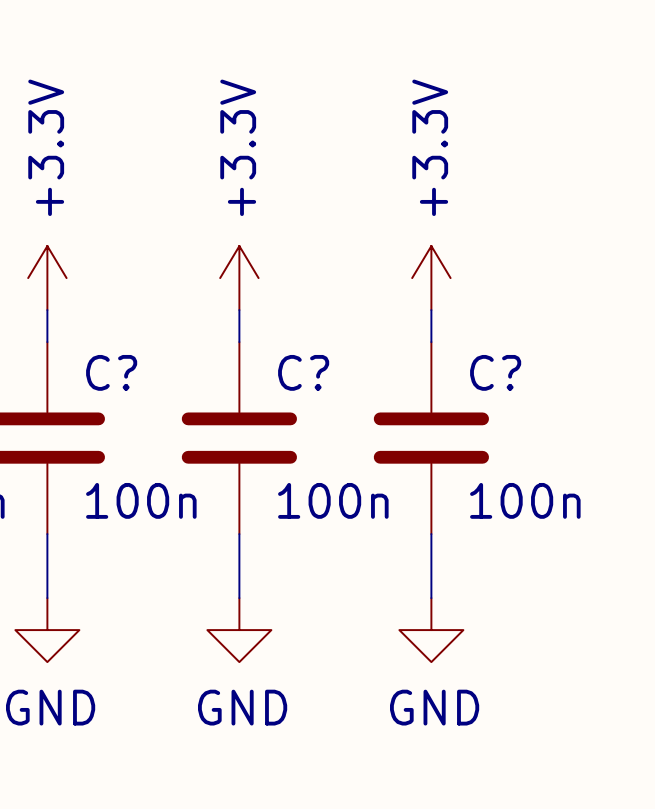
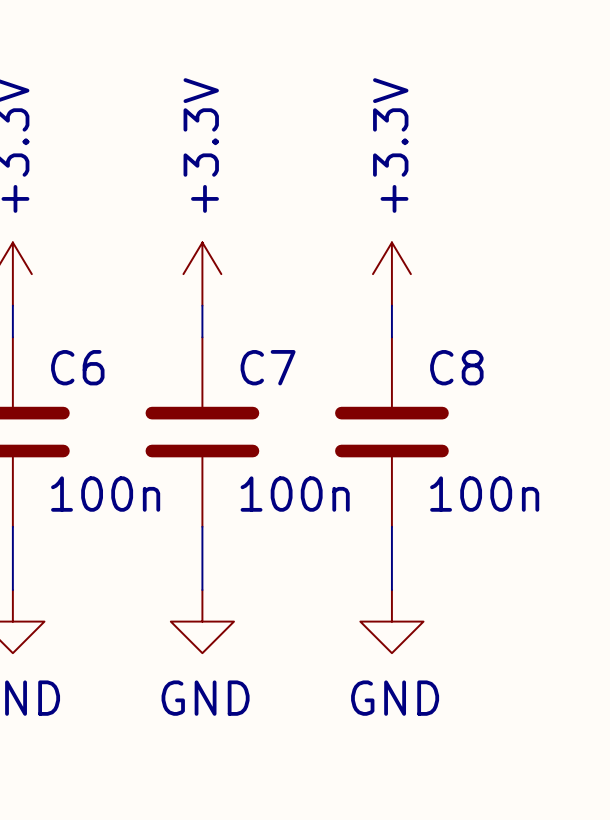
C? name: C? (111, 372) -> C6 (77, 367)
C? name: C? (303, 372) -> C7 (268, 367)
C? name: C? (495, 372) -> C8 (456, 367)

